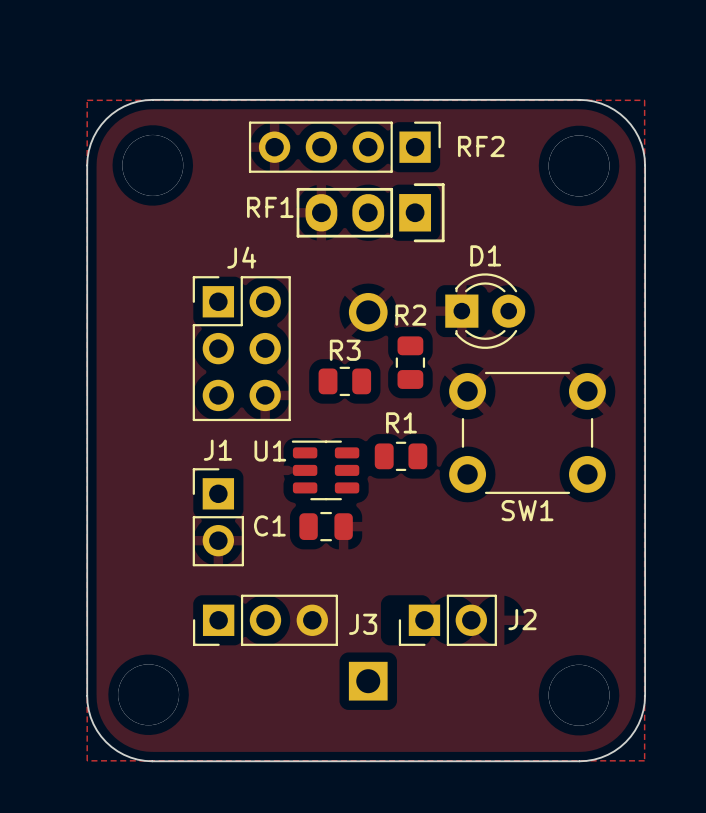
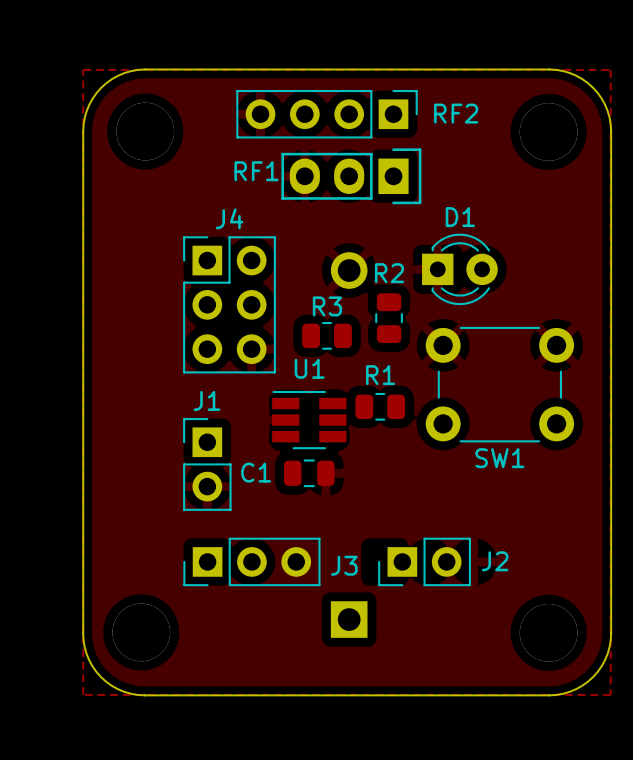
U1 footprint: [291, 440, 360, 501] -> [272, 390, 347, 450]
U1 name position: U1 (270, 450) -> U1 (309, 368)

